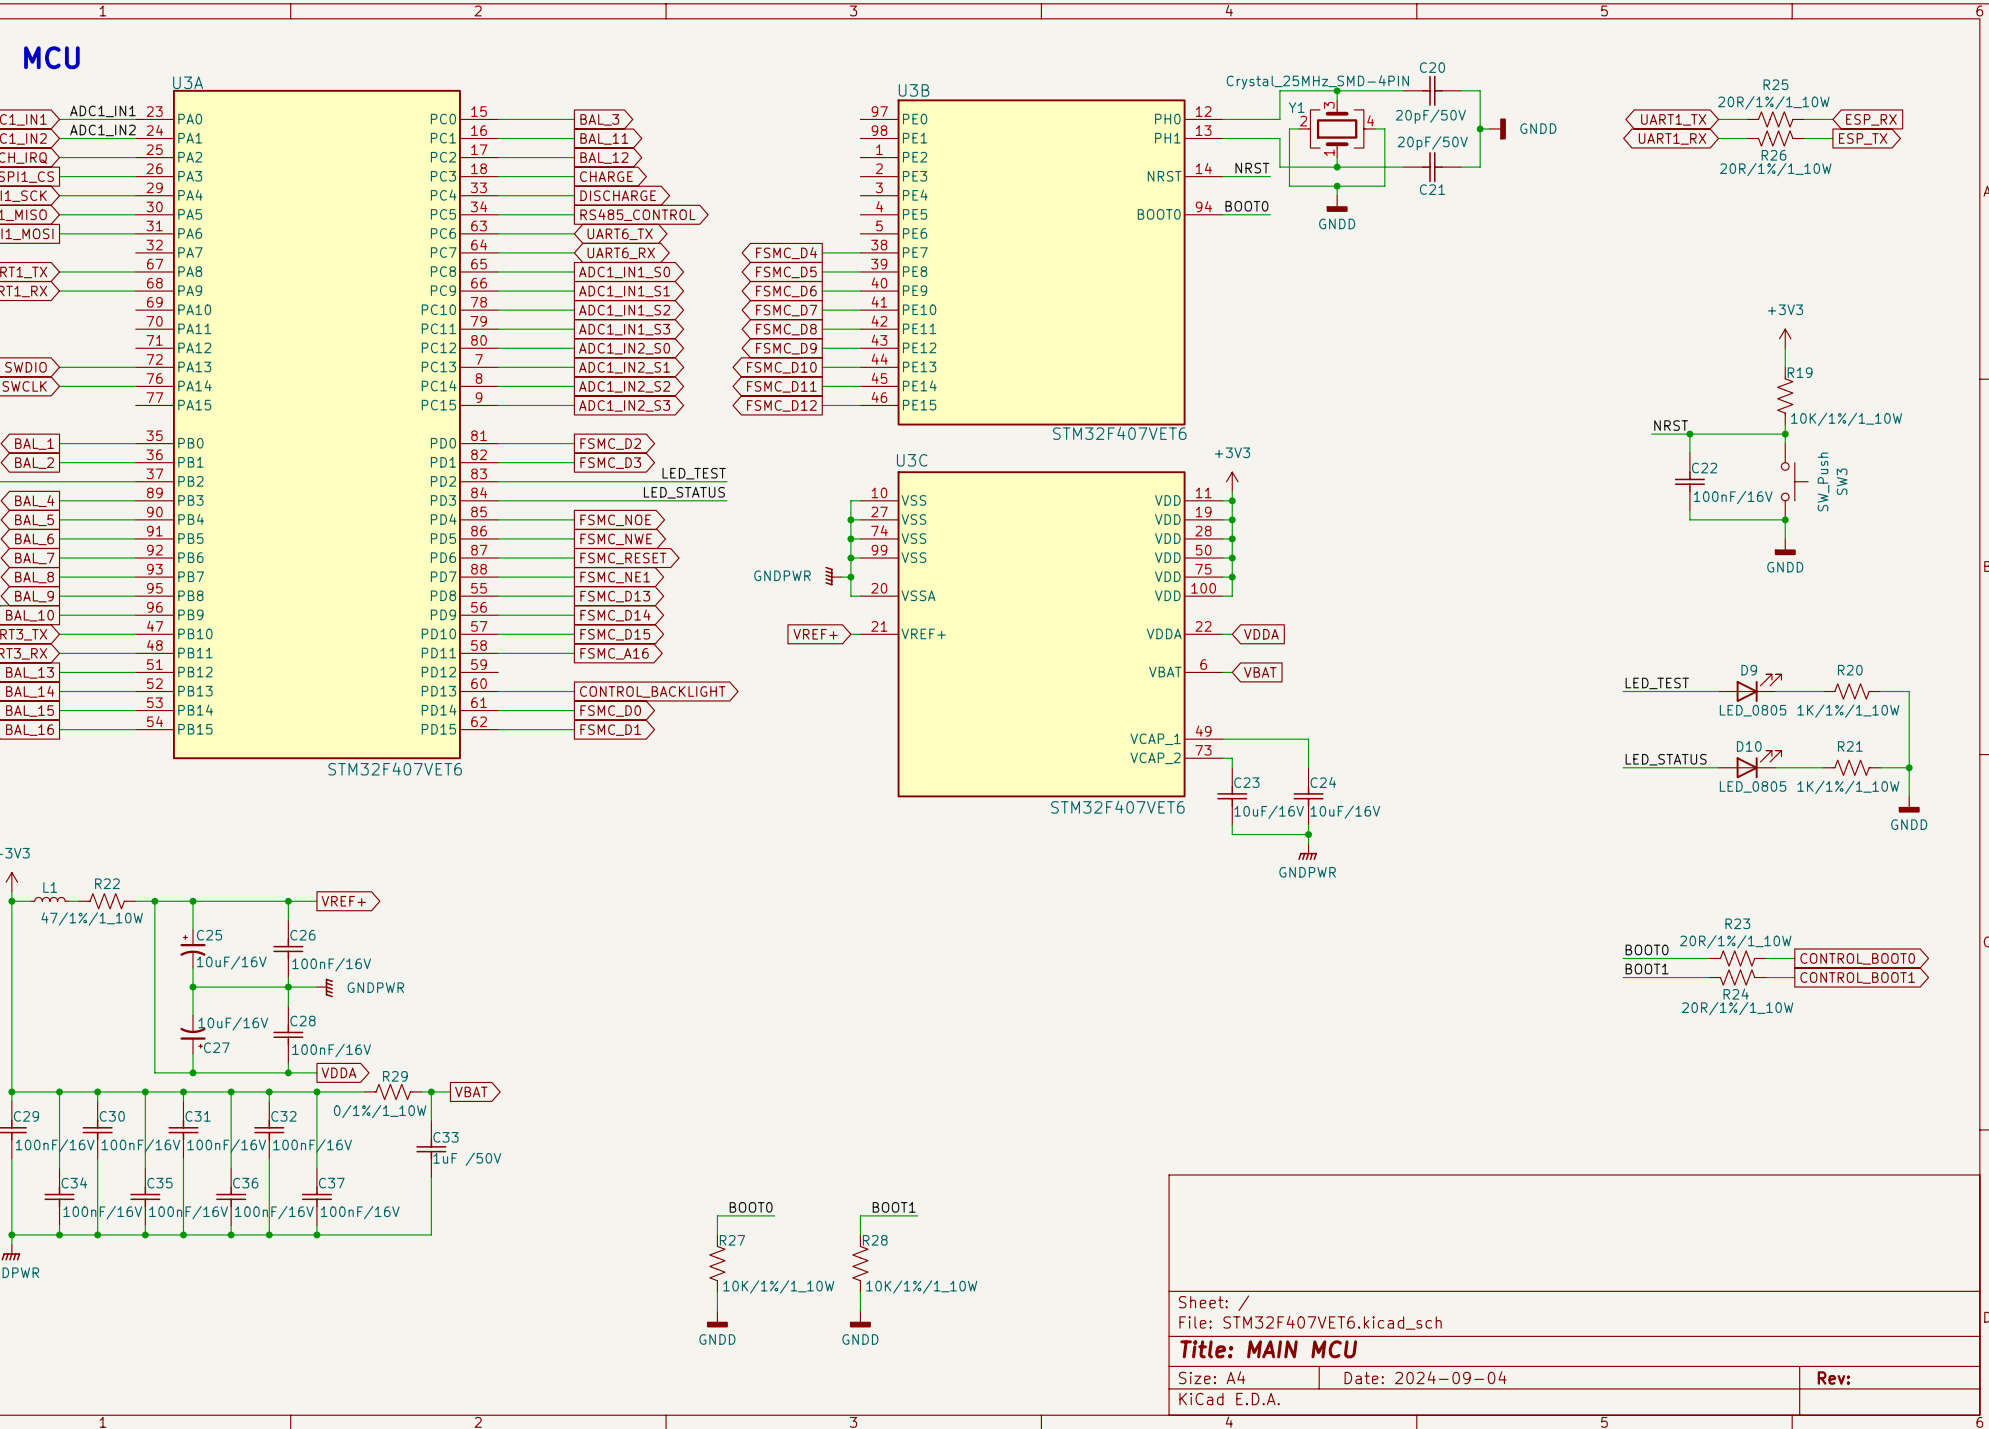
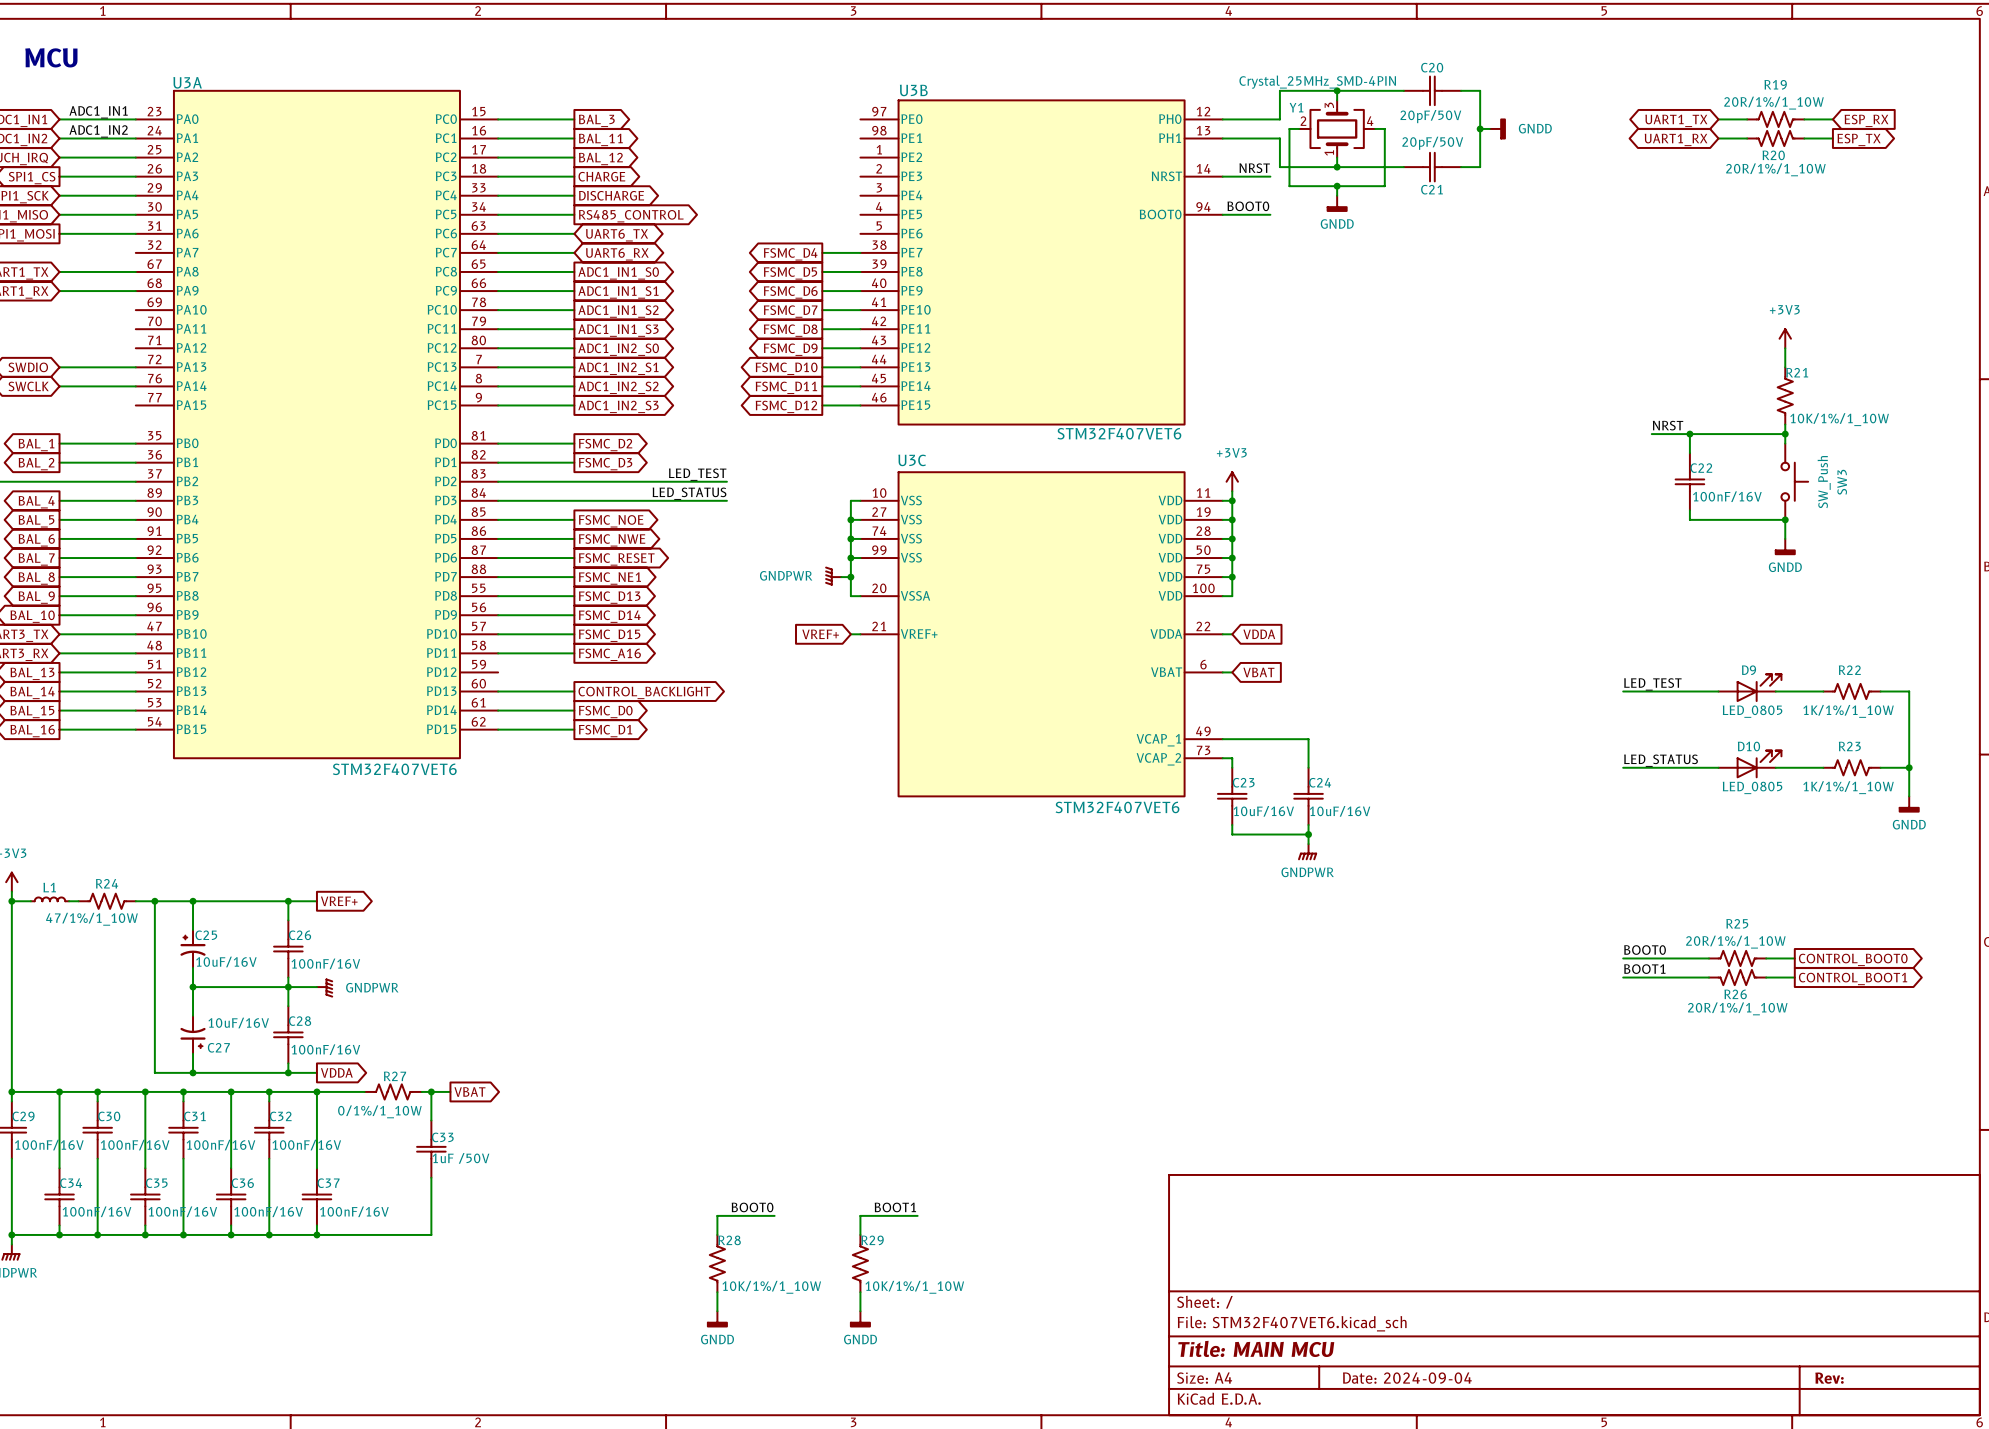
R25 name: R25 (1775, 84) -> R19 (1775, 84)
R26 name: R26 (1774, 155) -> R20 (1773, 155)
R19 name: R19 (1800, 372) -> R21 (1797, 372)
R20 name: R20 (1850, 670) -> R22 (1849, 670)
R21 name: R21 (1850, 746) -> R23 (1849, 746)
R22 name: R22 (107, 883) -> R24 (107, 883)
R23 name: R23 (1737, 923) -> R25 (1737, 923)
R24 name: R24 (1736, 994) -> R26 (1735, 994)
R29 name: R29 (395, 1076) -> R27 (394, 1076)
R27 name: R27 (732, 1240) -> R28 (729, 1240)
R28 name: R28 (875, 1240) -> R29 (872, 1240)

